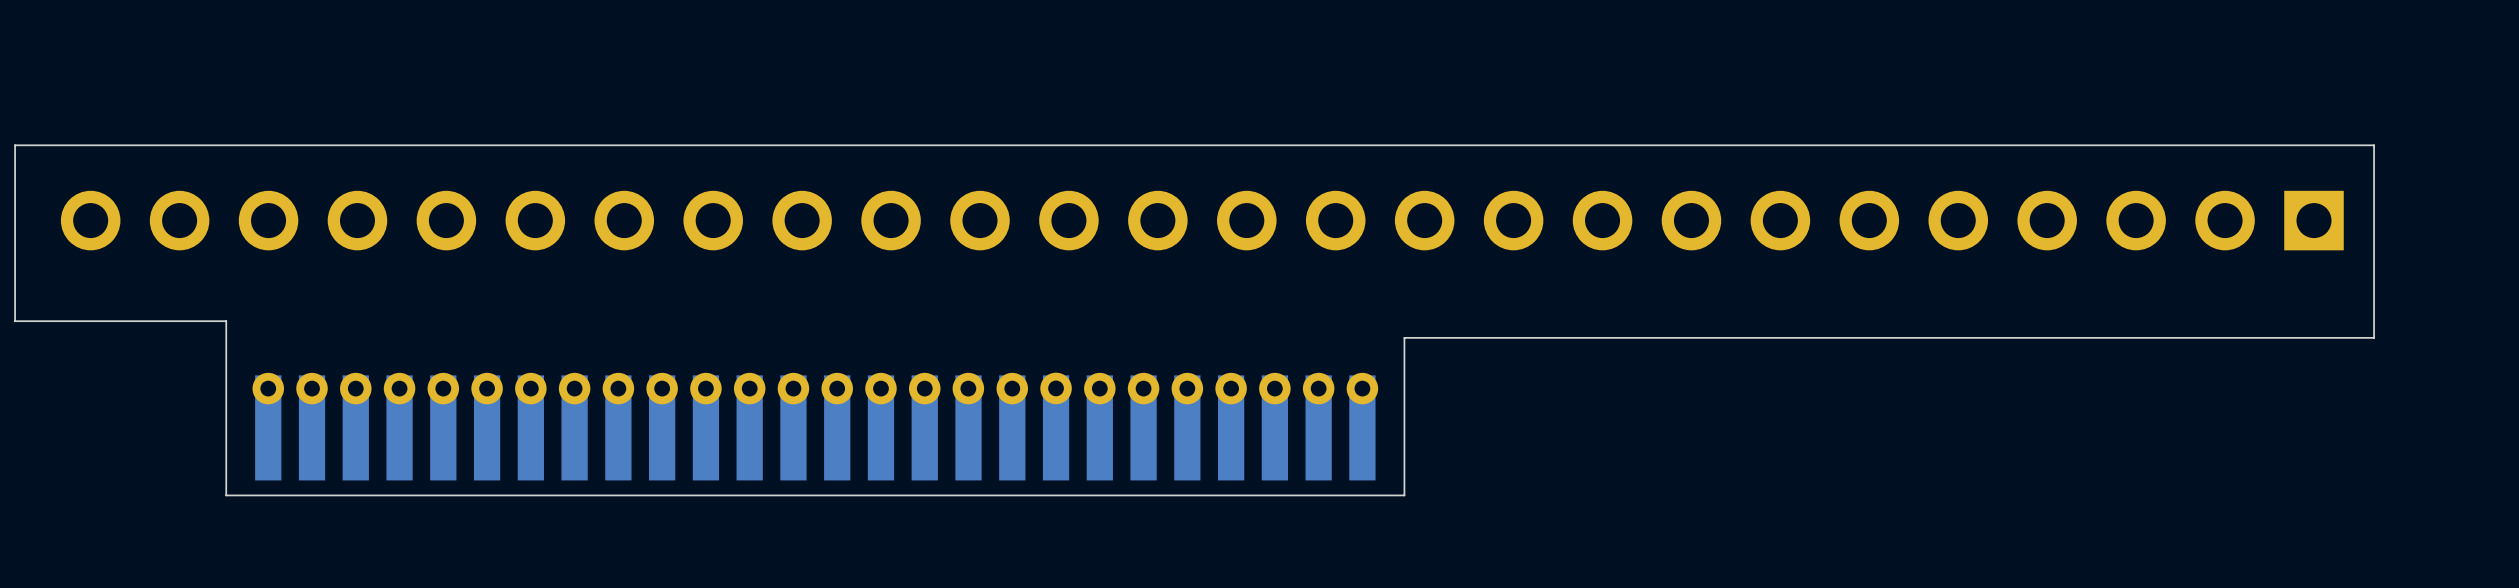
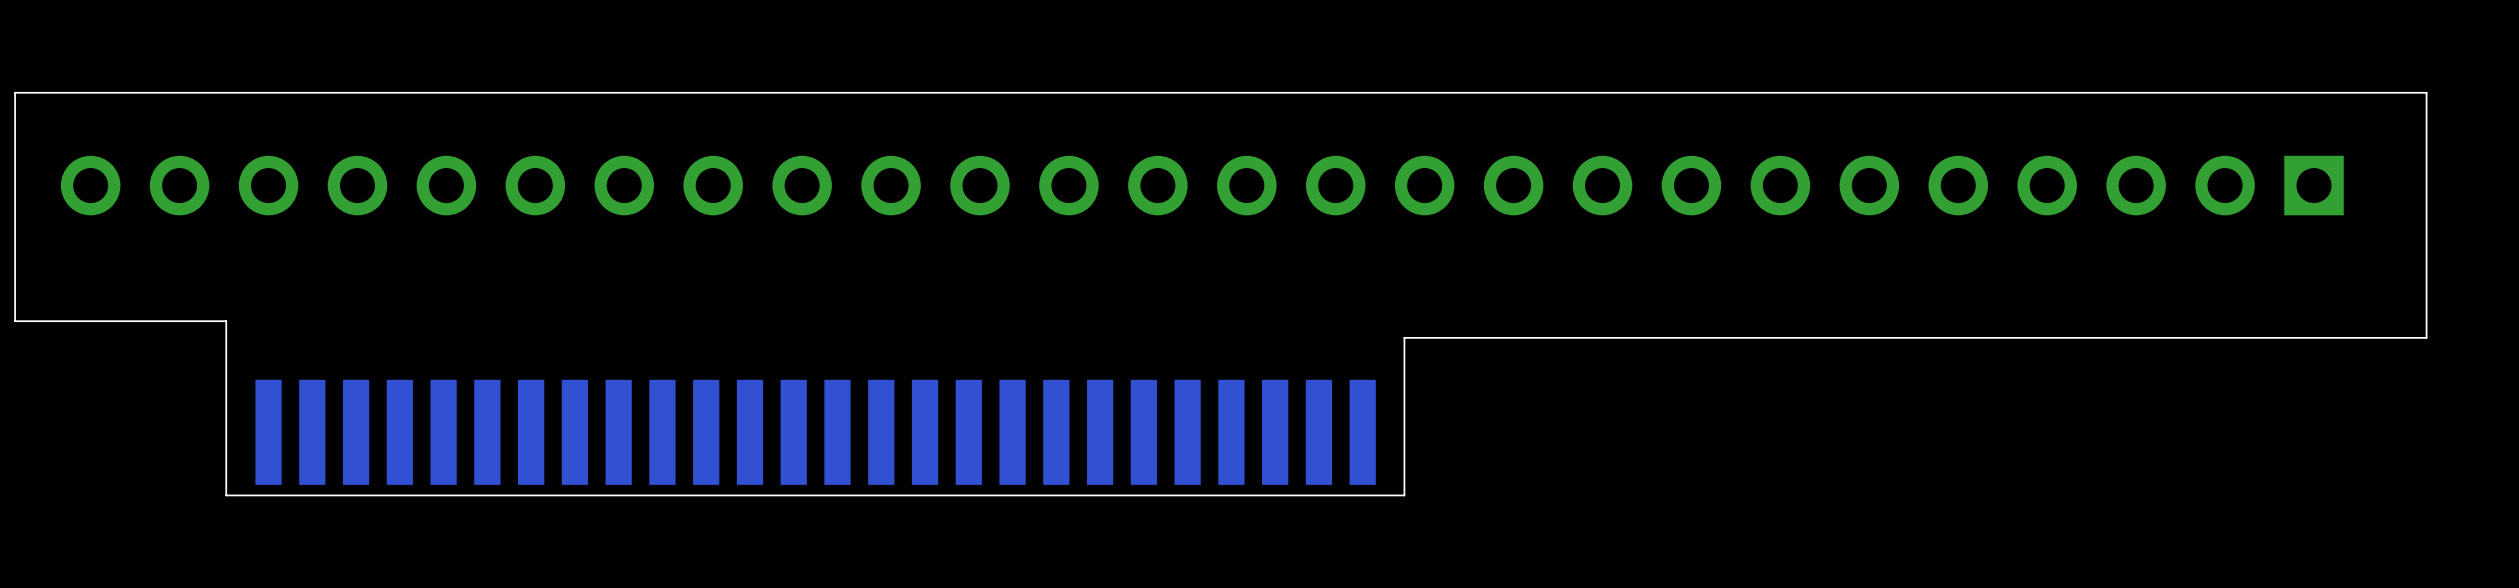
board edge: (15, 145) (2374, 145) (2374, 337) -> (15, 145) (15, 92) (2426, 92) (2426, 337) (2374, 337)
part position: (1202, 220) -> (1202, 185)
part footprint: [252, 372, 1379, 481] -> [255, 379, 1376, 485]

